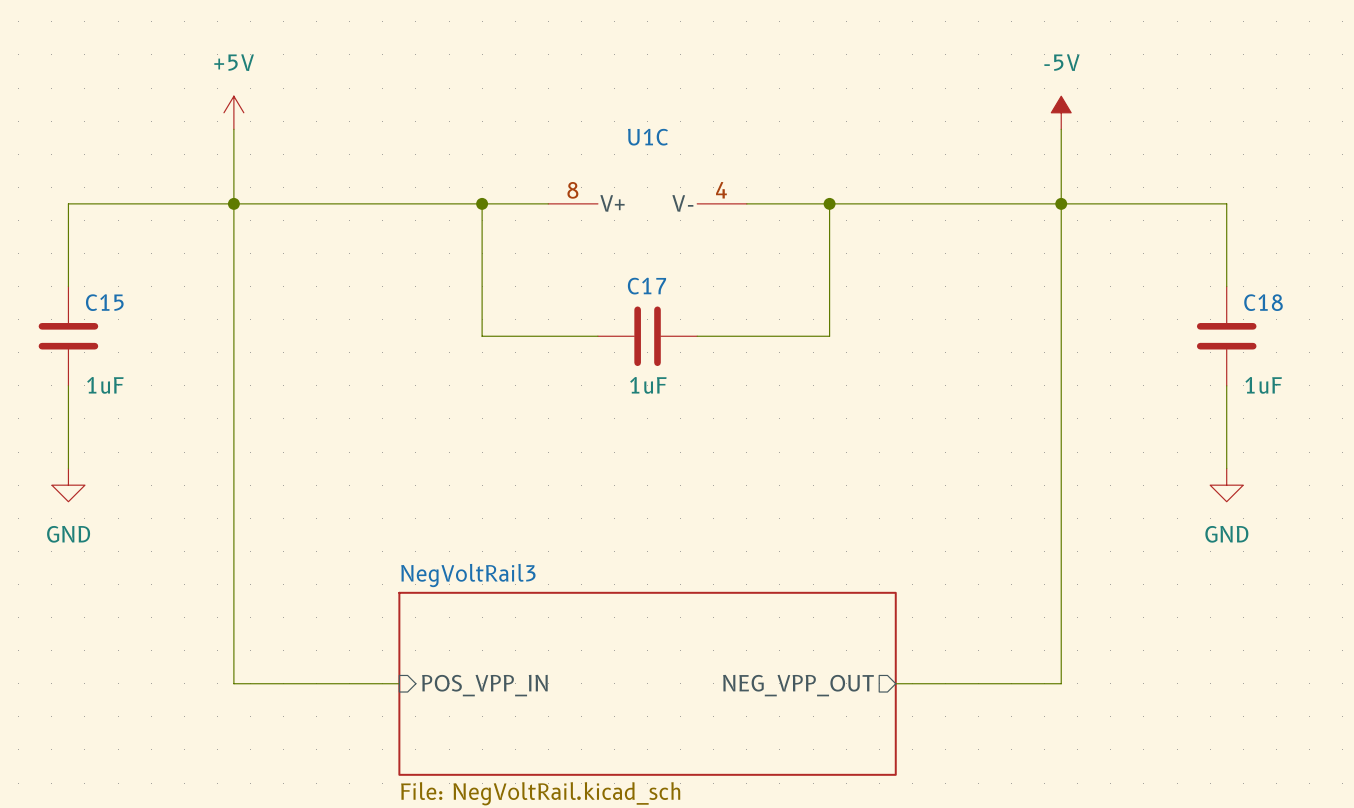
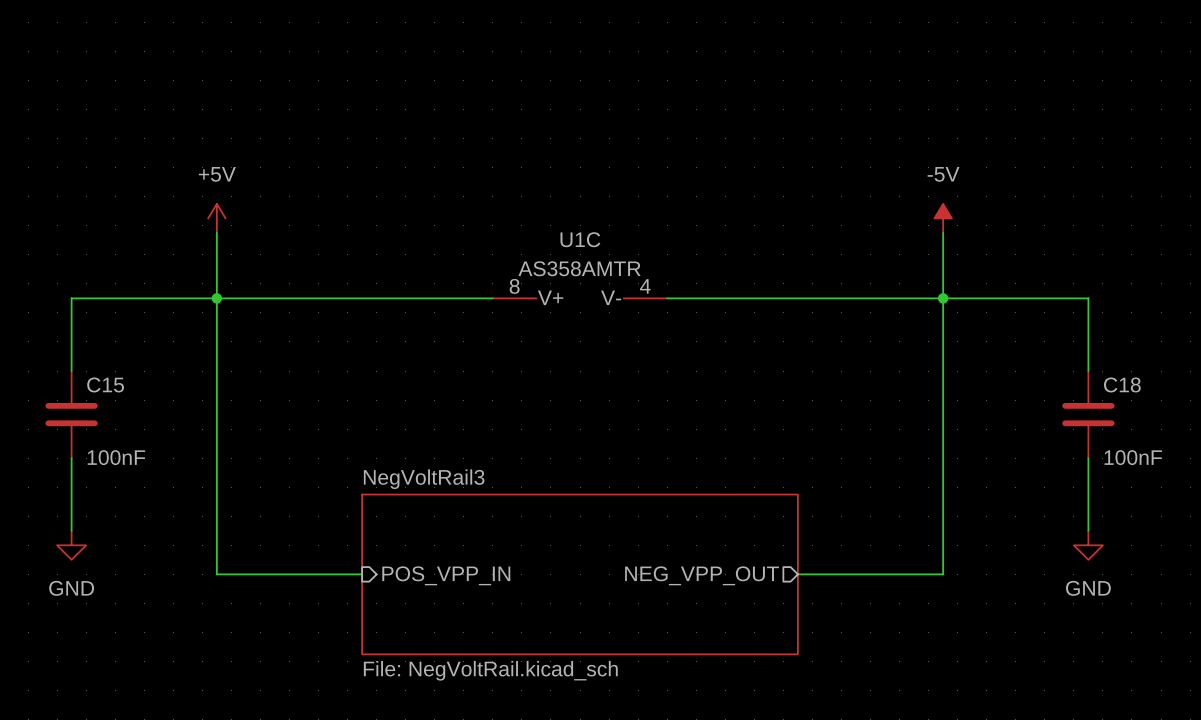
power symbol position: +5V (233, 112) -> +5V (216, 218)
power symbol position: -5V (1061, 112) -> -5V (943, 218)
wire: (233, 129) (233, 294) -> none
wire: (1061, 129) (1061, 294) -> none
junction: (233, 203) -> none
wire: (482, 203) (482, 336) (597, 336) -> none
junction: (482, 203) -> none
wire: (548, 203) (68, 203) (68, 286) -> none
U1C position: (647, 203) -> (580, 298)
wire: (746, 203) (1226, 203) (1226, 286) -> none
wire: (829, 203) (829, 336) (697, 336) -> none
junction: (829, 203) -> none
junction: (1061, 203) -> none
U1C value: none -> AS358AMTR (579, 268)
C15 position: (68, 336) -> (71, 414)
C17: 1uF (647, 336) -> none
C18 position: (1226, 336) -> (1088, 414)
junction: none -> (216, 298)
wire: none -> (492, 298) (71, 298) (71, 312)
wire: none -> (667, 298) (1088, 298) (1088, 312)
junction: none -> (943, 298)
C15 value: 1uF (105, 385) -> 100nF (116, 457)
C18 value: 1uF (1263, 385) -> 100nF (1133, 457)
power symbol position: GND (68, 485) -> GND (71, 545)
power symbol position: GND (1226, 485) -> GND (1088, 545)
wire: none -> (71, 458) (71, 530)
wire: none -> (1088, 458) (1088, 530)

